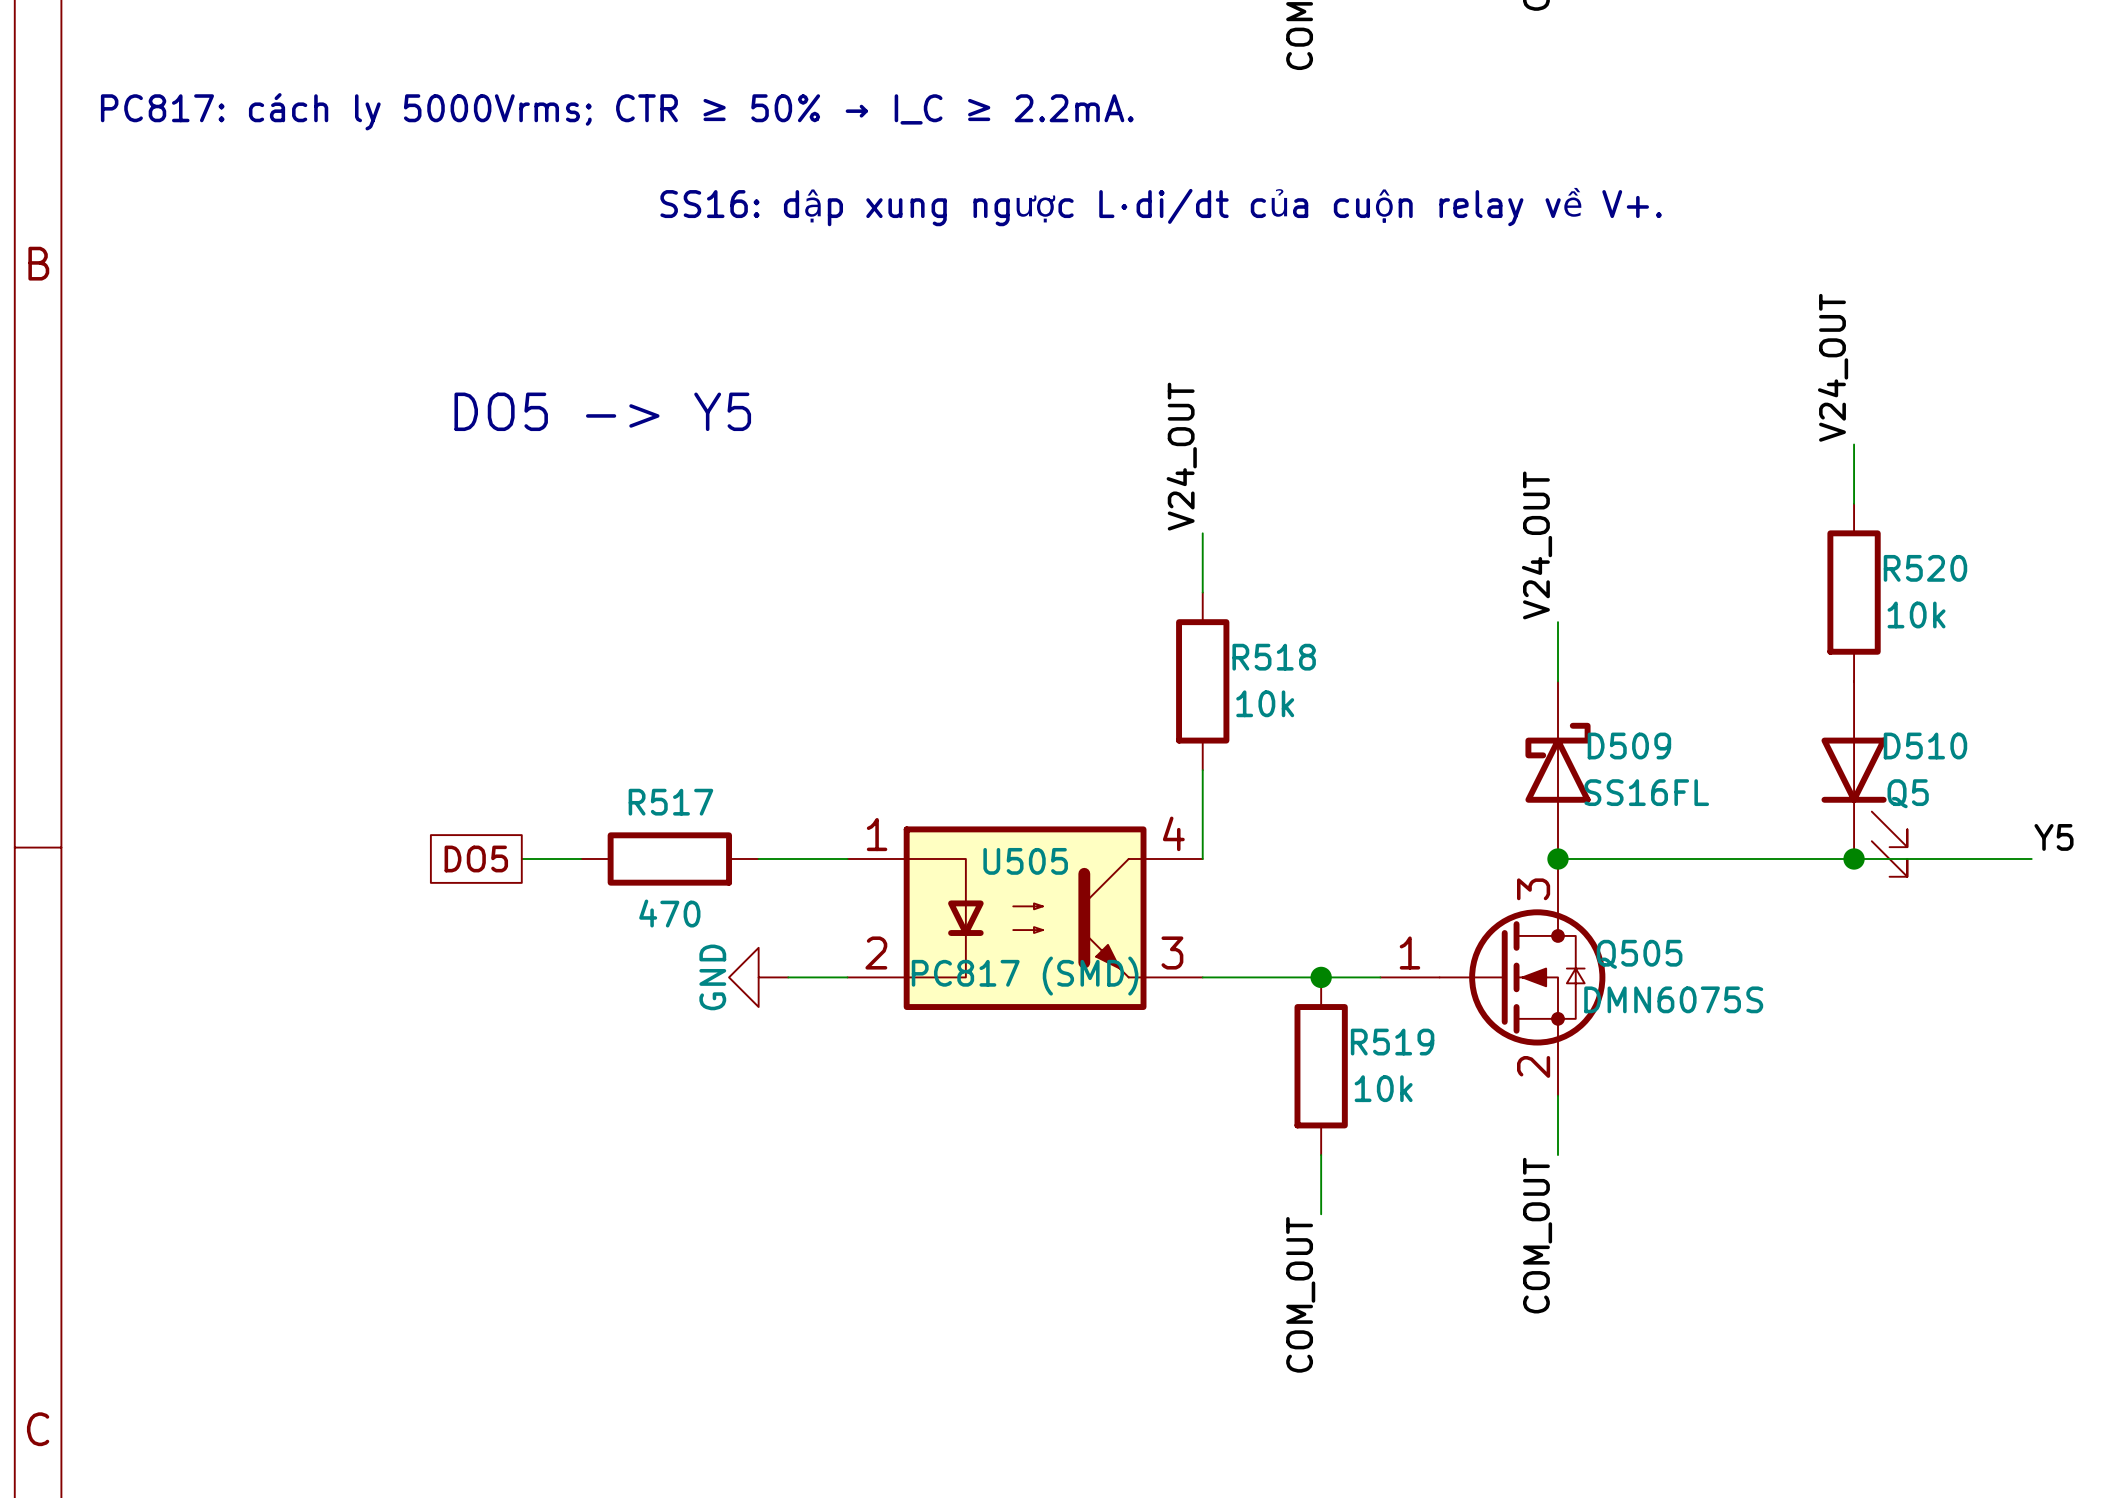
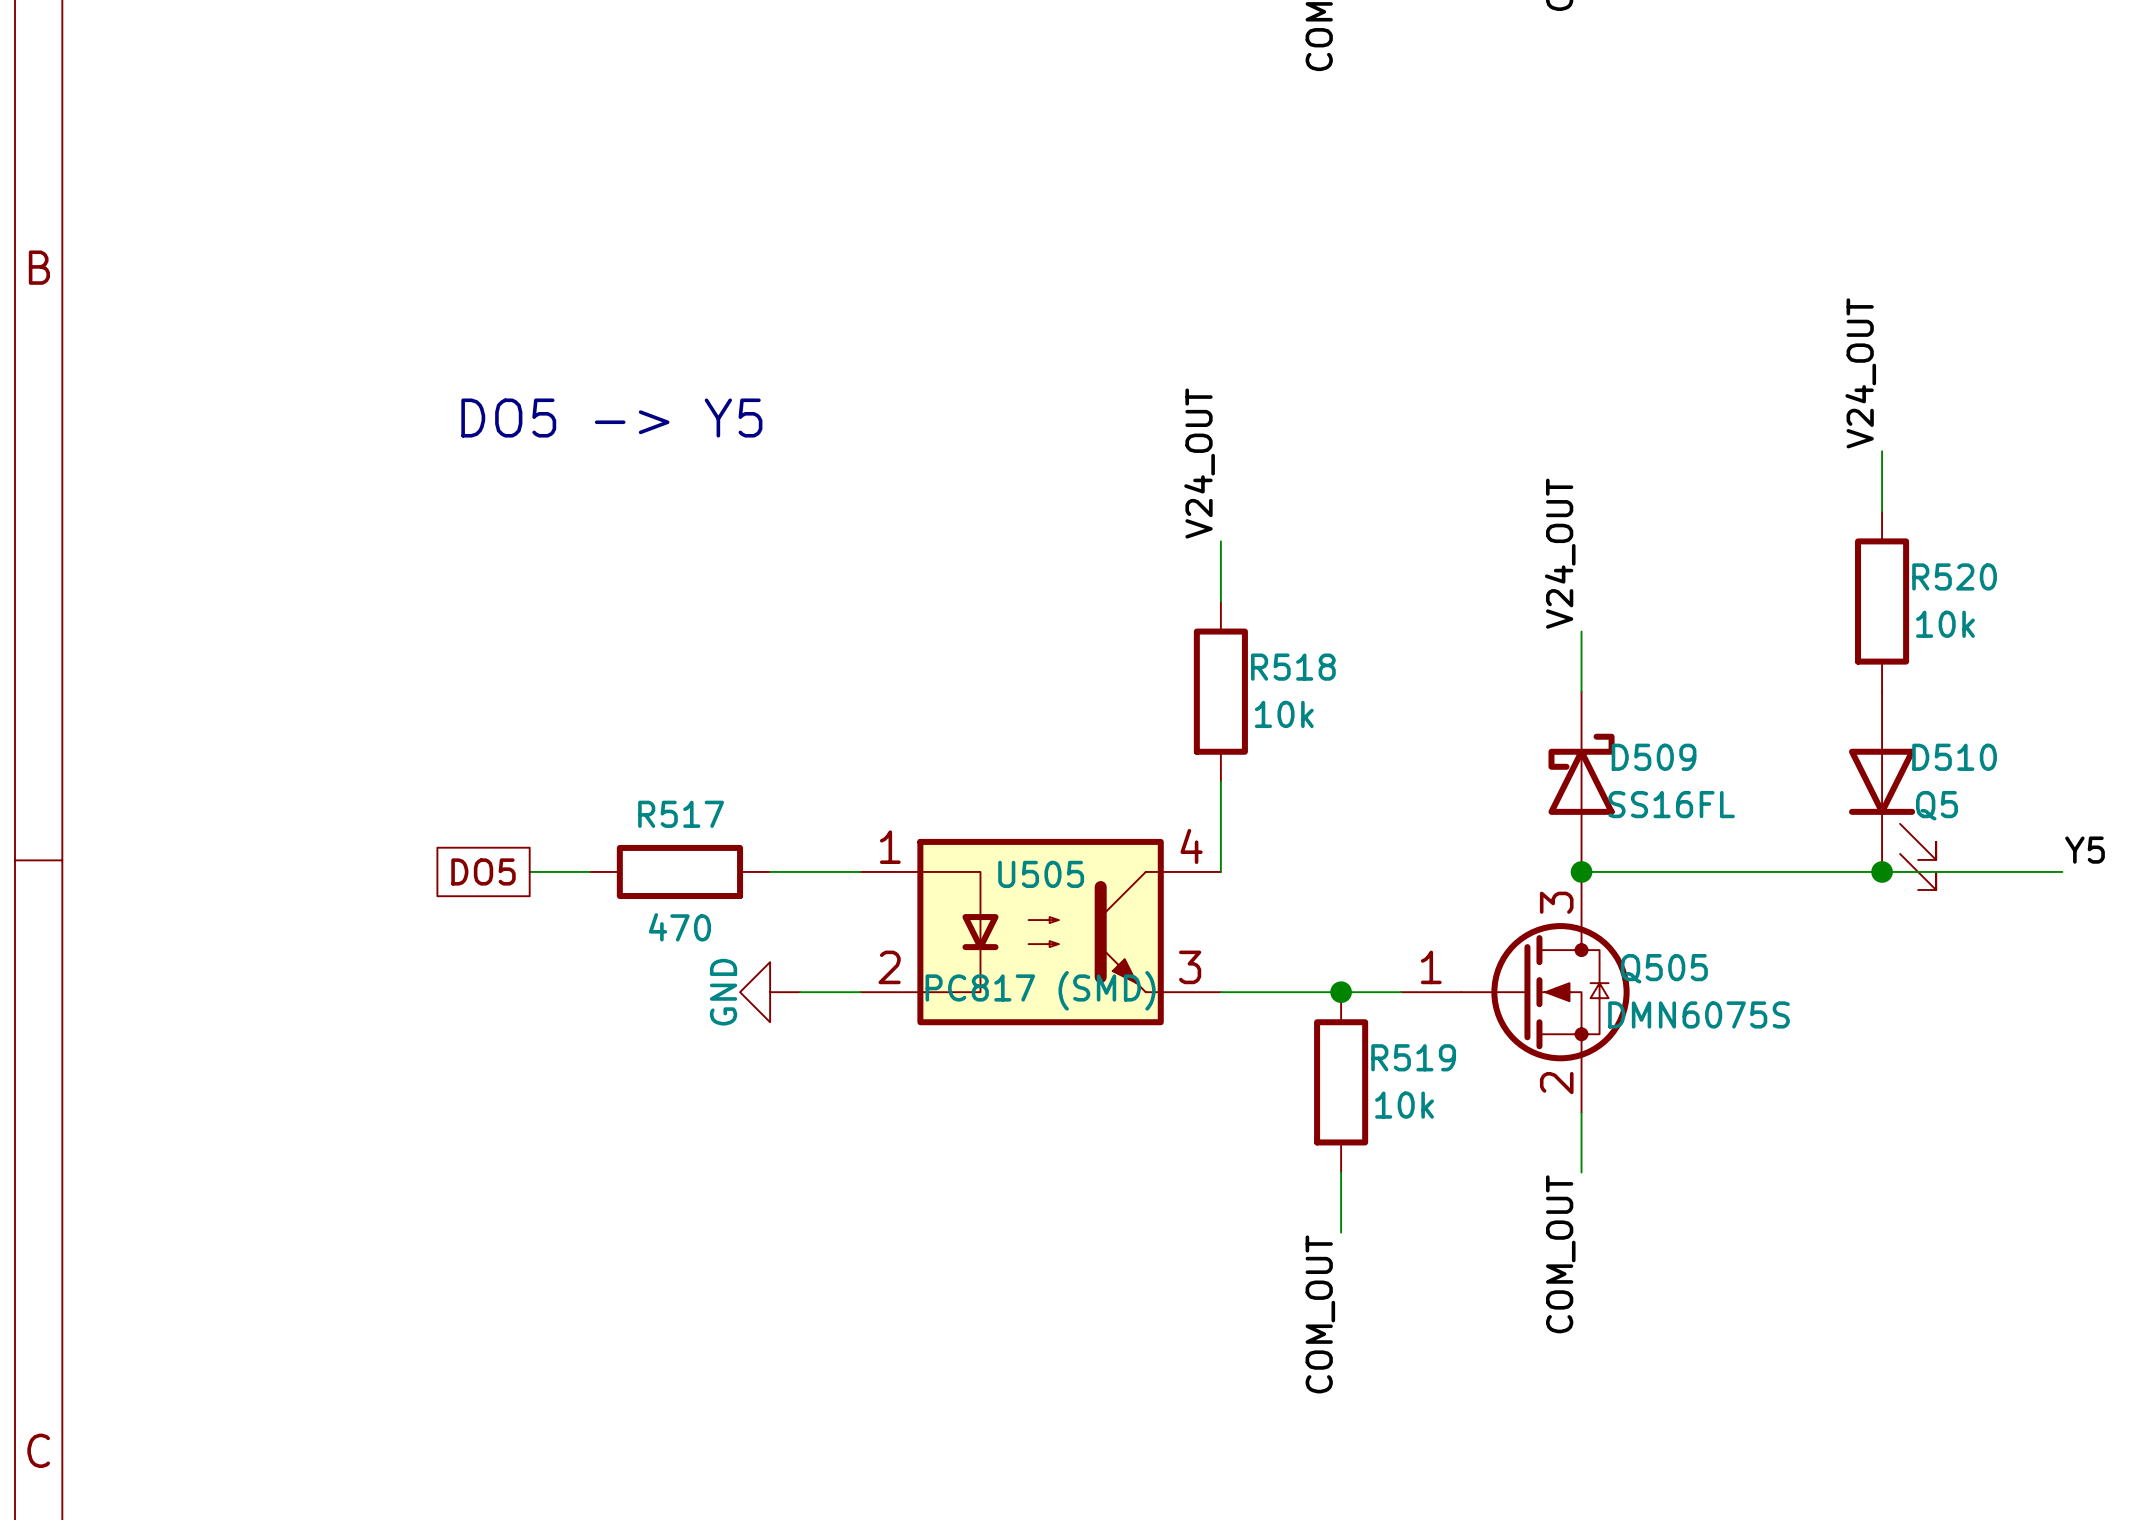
text: PC817: cách ly 5000Vrms; CTR ≥ 50% → I_C ≥ 2.2mA. (617, 111) -> none
text: SS16: dập xung ngược L·di/dt của cuộn relay về V+. (1161, 206) -> none

